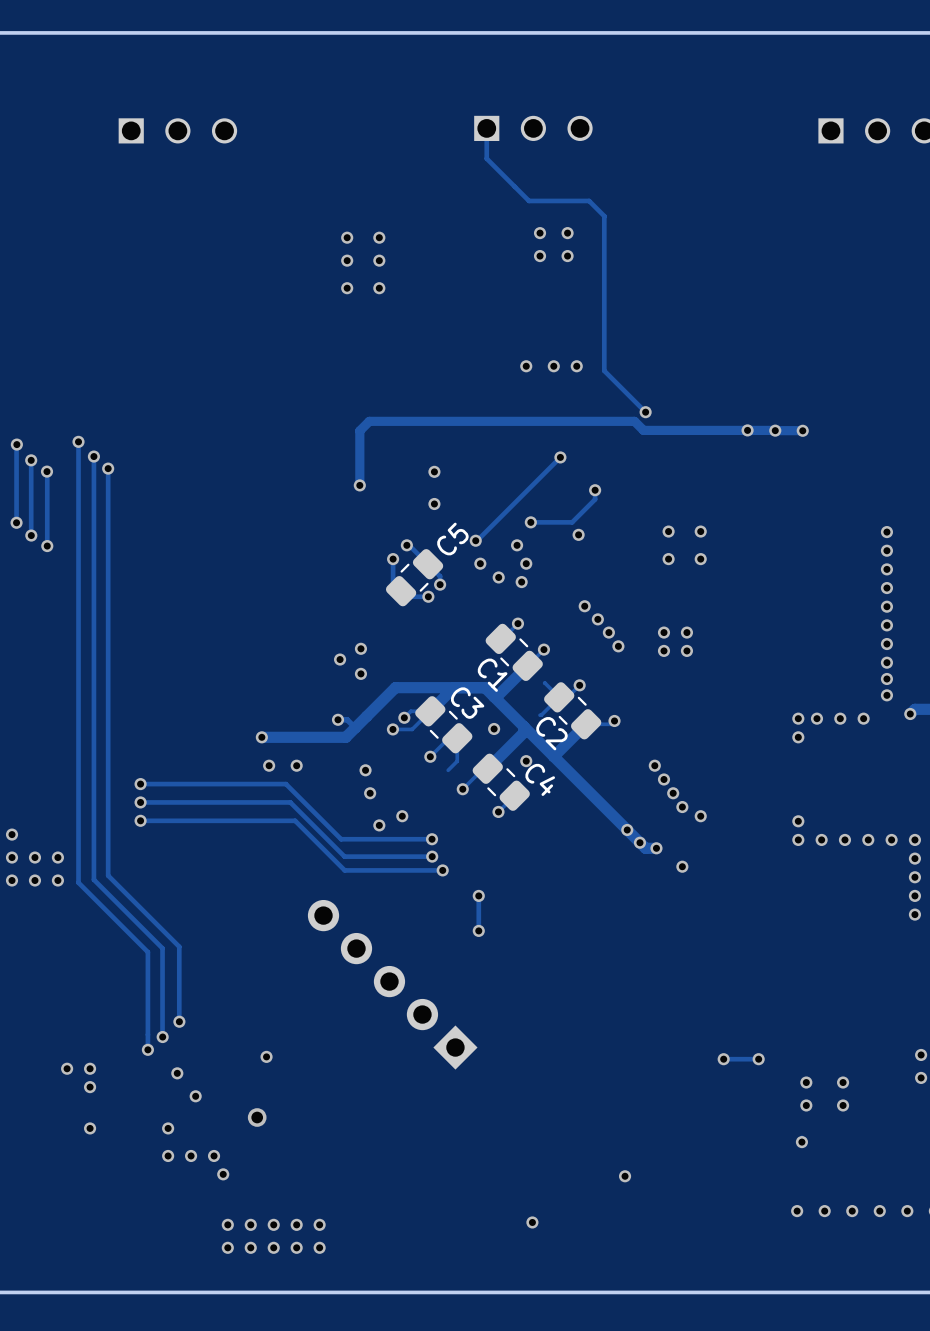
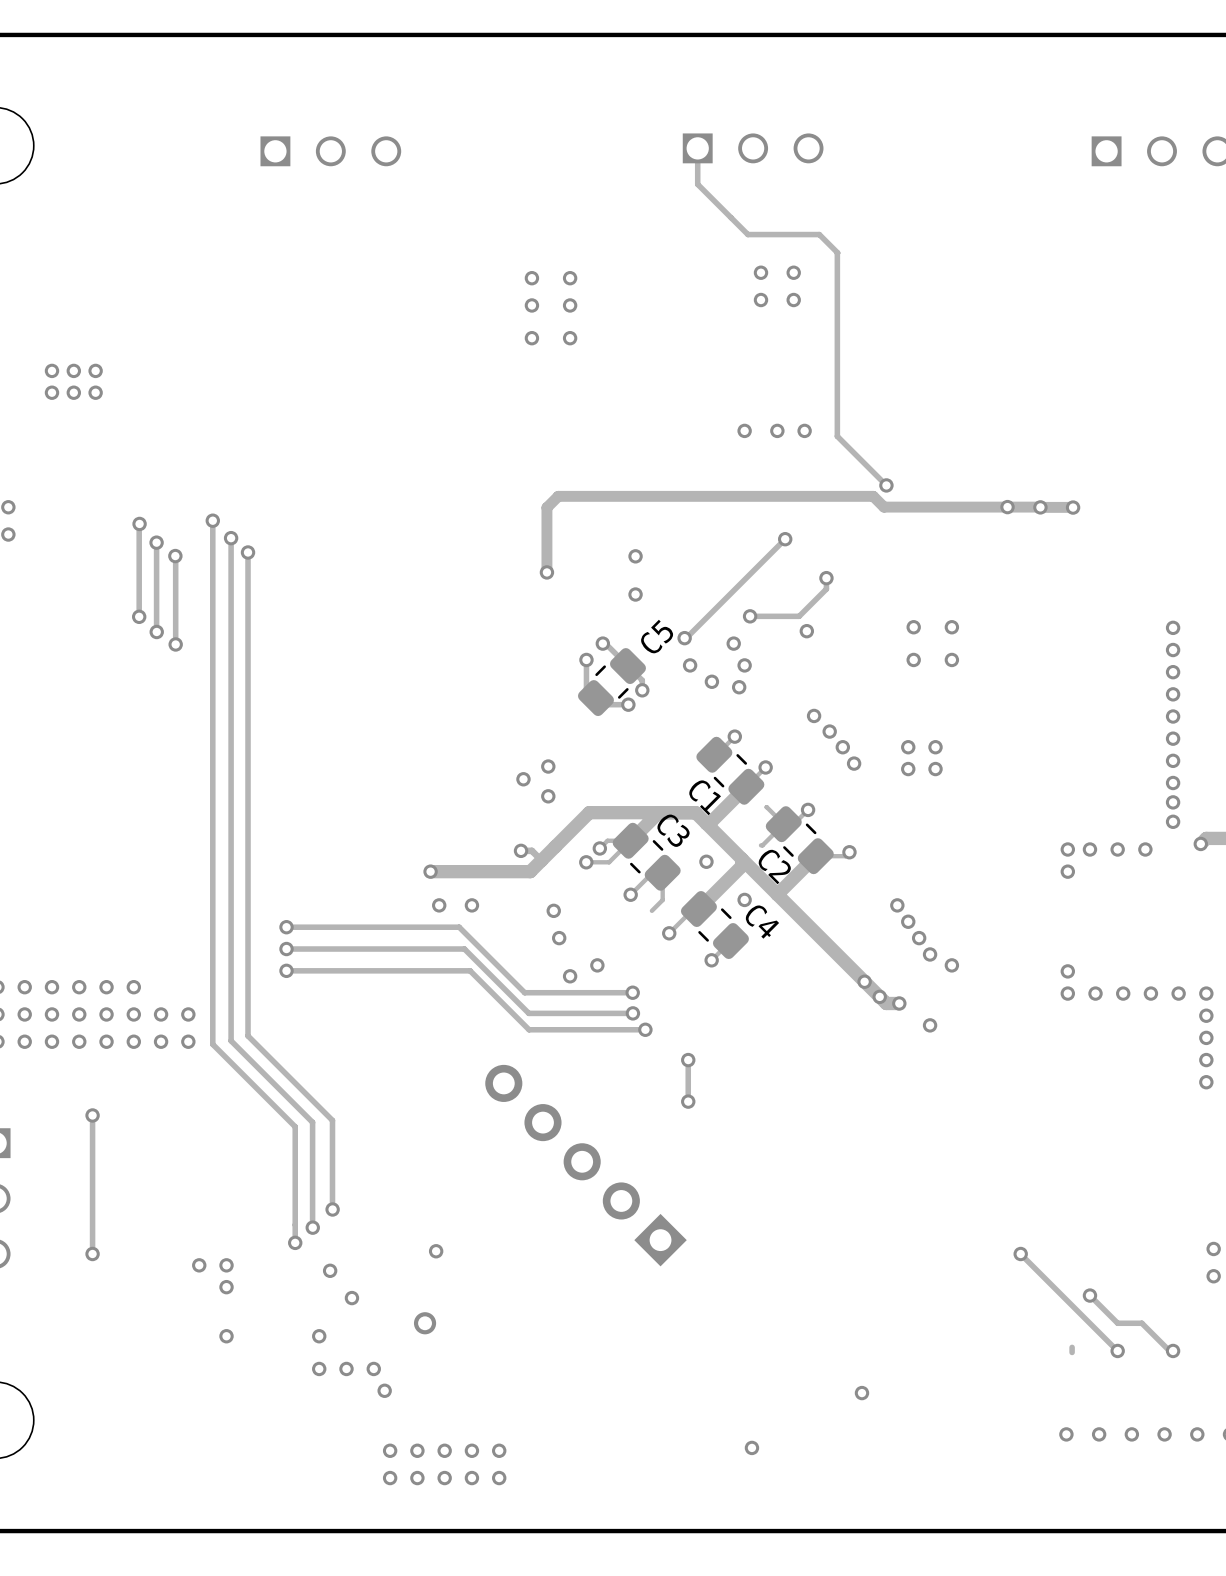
via: (723, 1059) -> none
track: (758, 1059) (723, 1059) -> (1020, 1254) (1117, 1350)
via: (806, 1082) -> none
via: (843, 1082) -> none
track: none -> (1089, 1295) (1117, 1323) (1141, 1323) (1169, 1350) (1173, 1350)
via: none -> (1089, 1295)
via: (806, 1105) -> none
via: (843, 1105) -> none
via: none -> (1117, 1350)
via: none -> (1173, 1350)
via: (801, 1142) -> none

